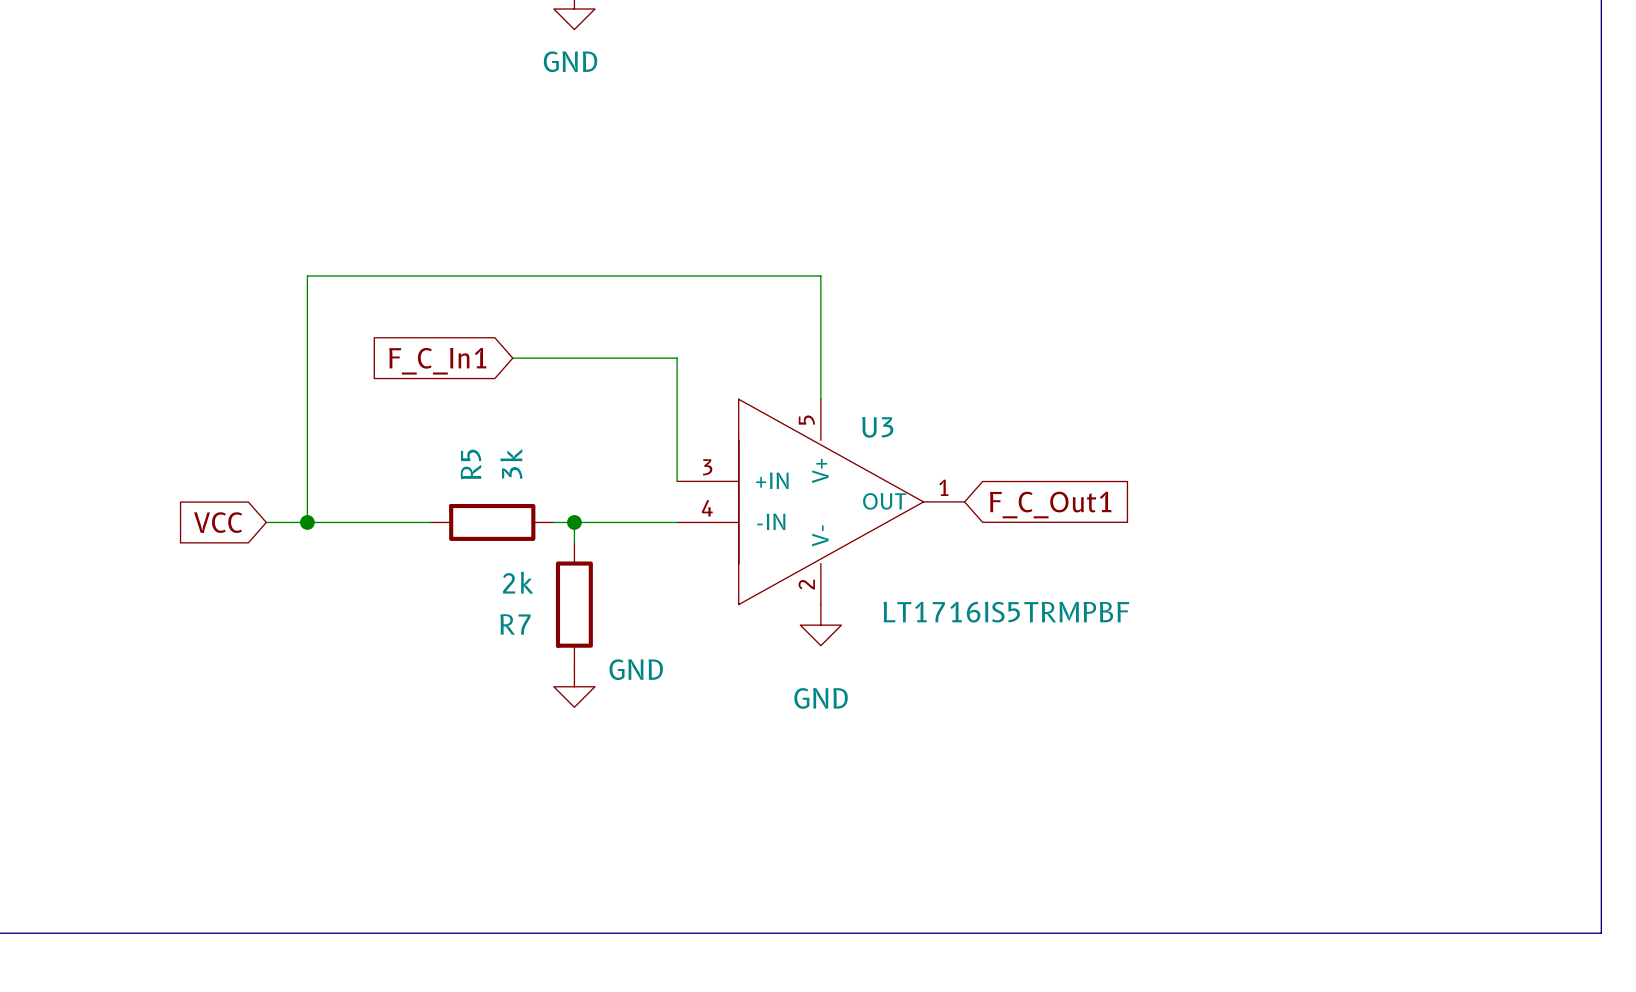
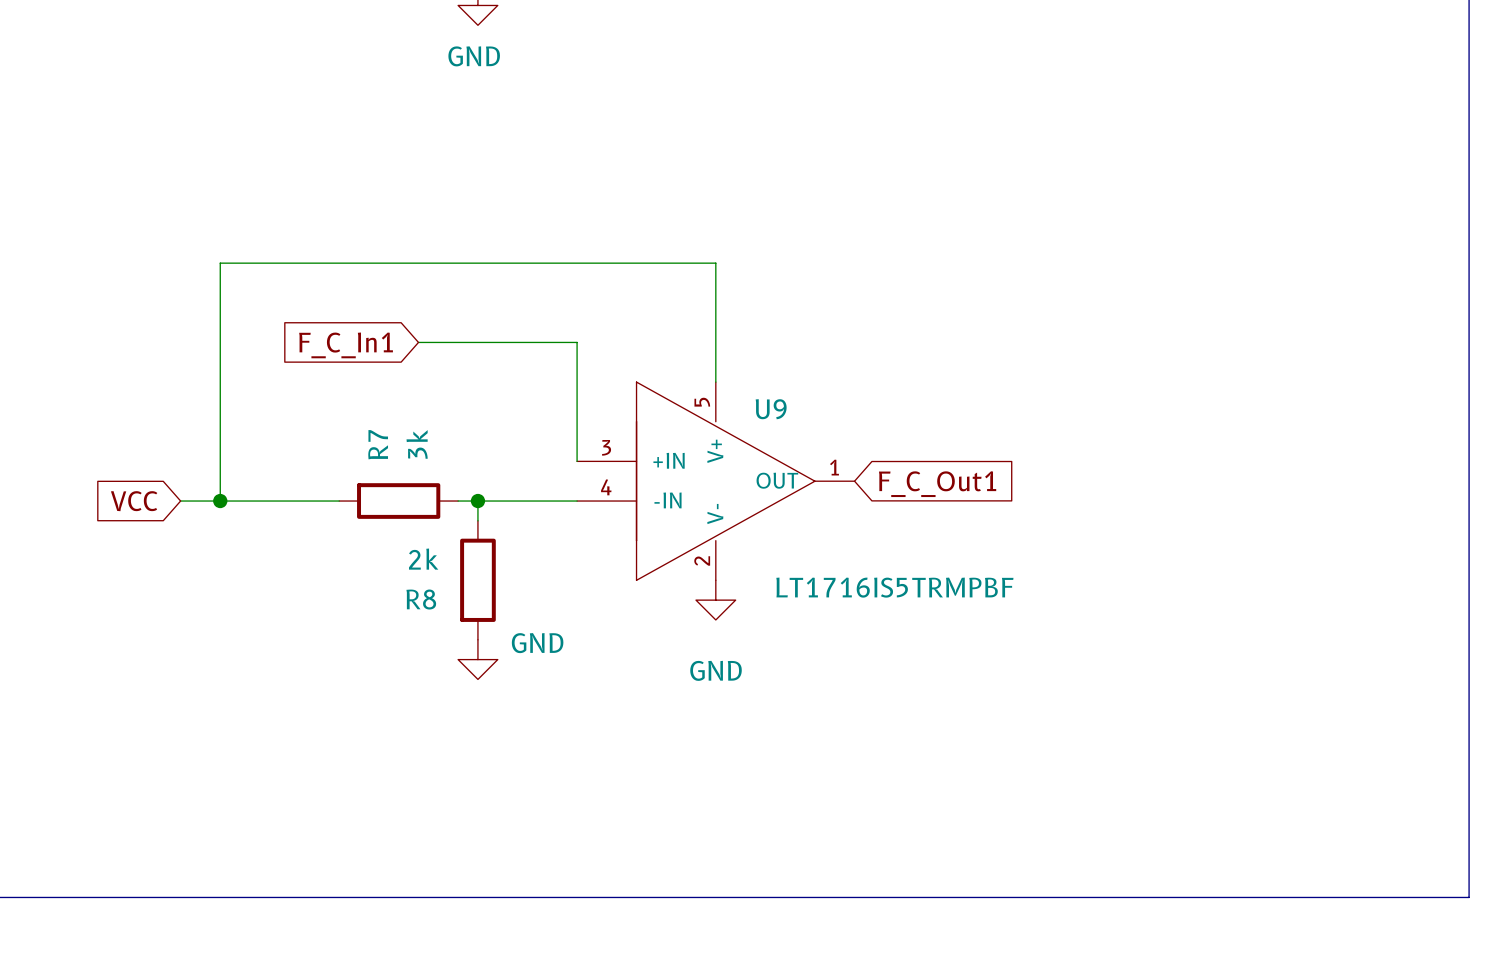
U3 name: U3 (877, 427) -> U9 (771, 409)
R5 name: R5 (471, 464) -> R7 (378, 444)
R7 name: R7 (515, 624) -> R8 (421, 599)

